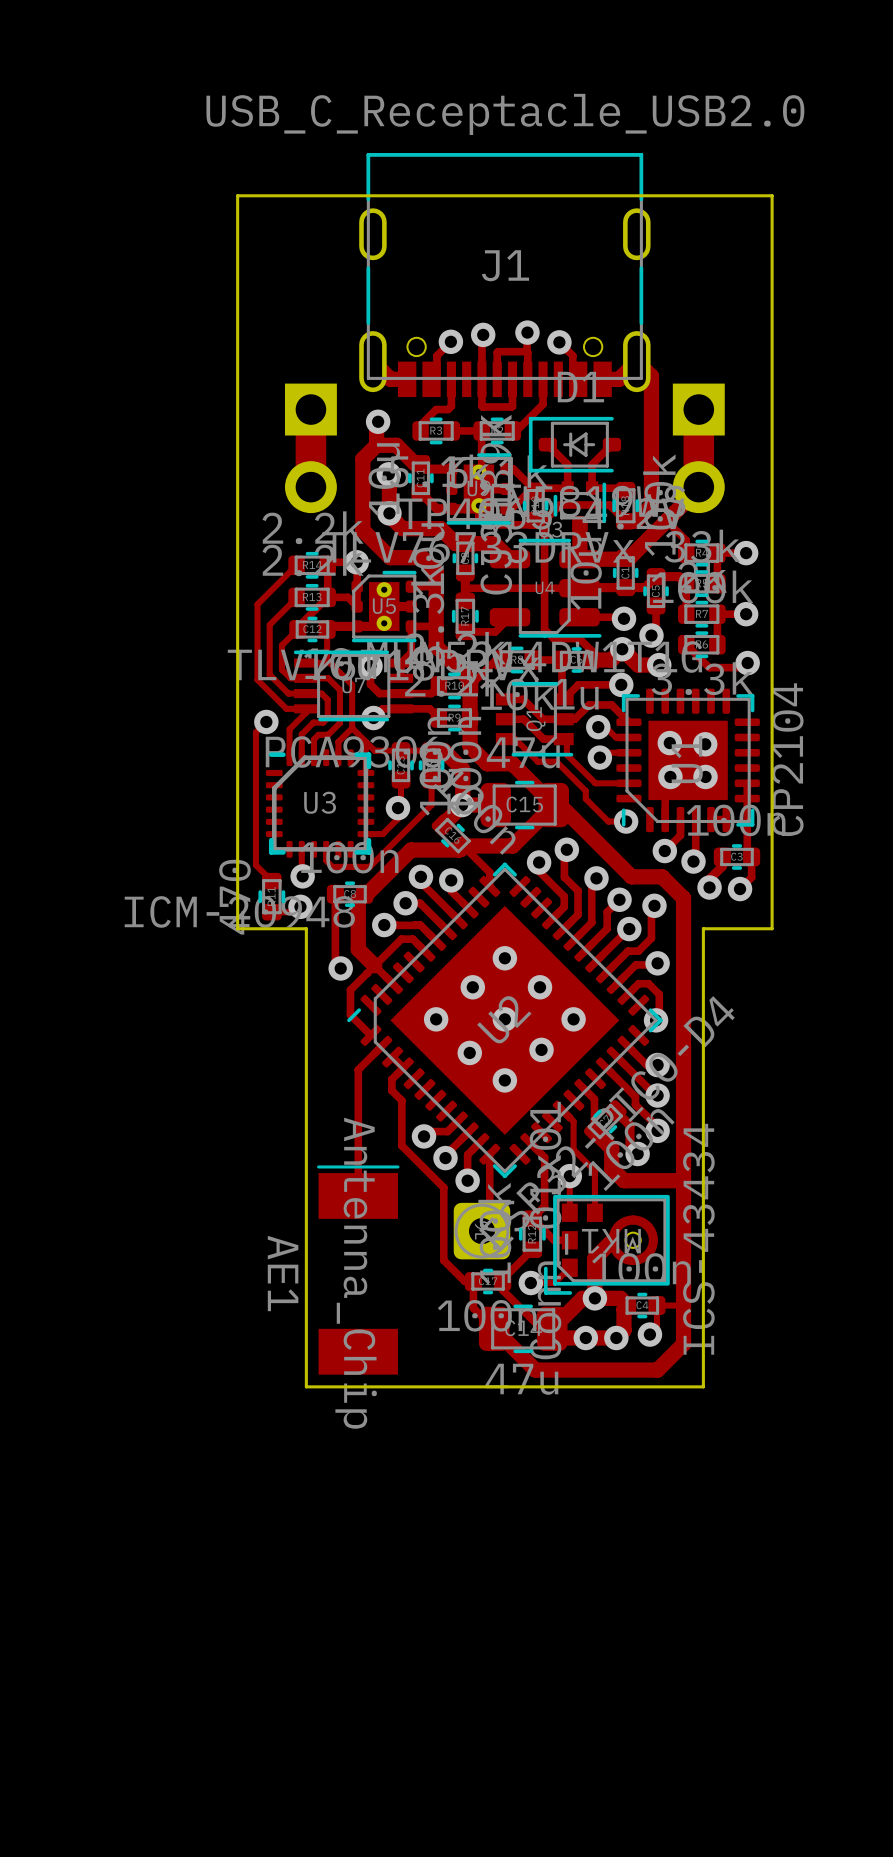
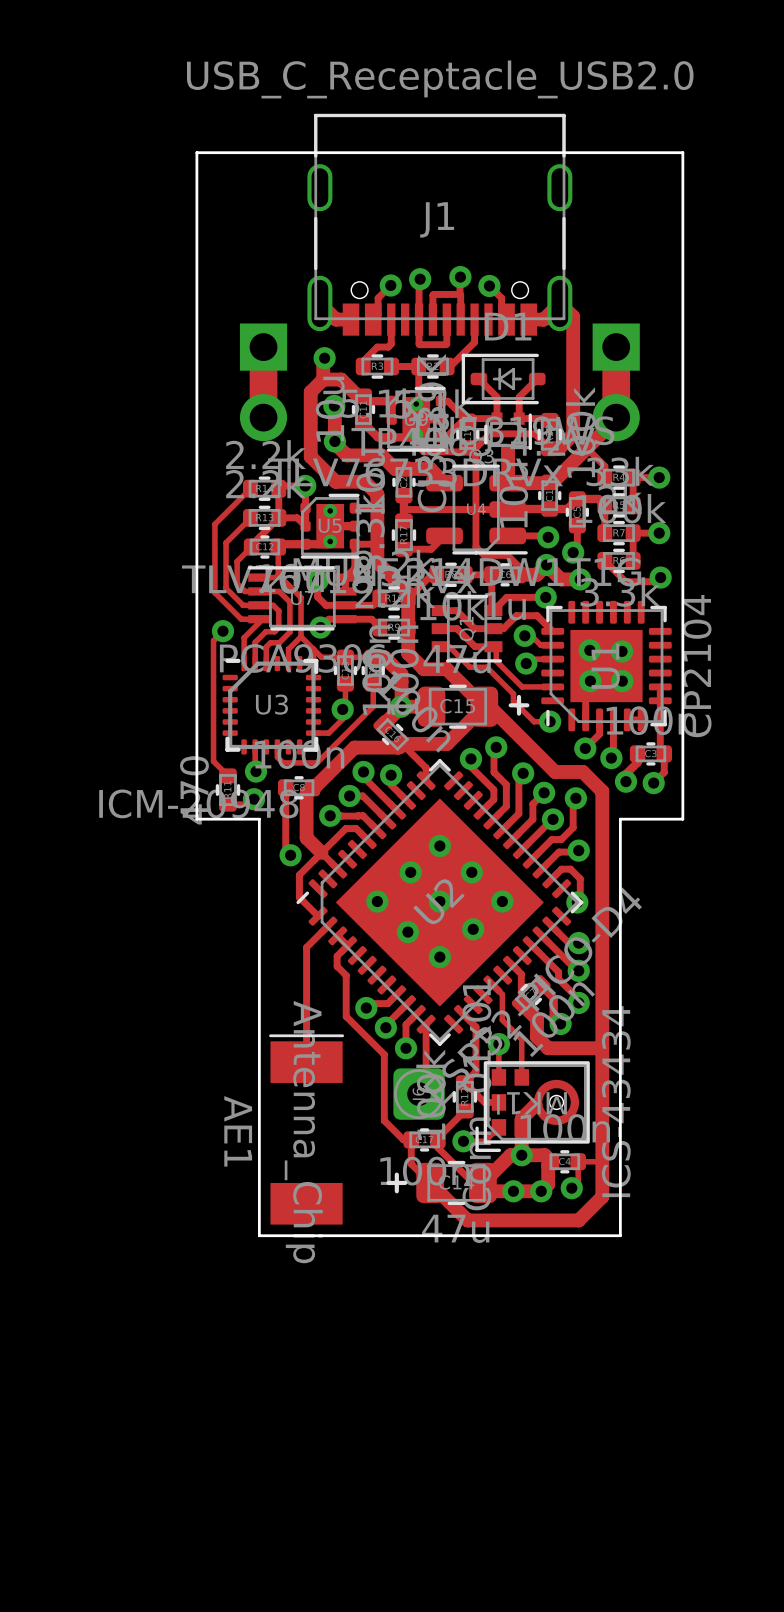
line: none -> (519, 696) (519, 713)
line: none -> (510, 705) (527, 705)
line: none -> (396, 1174) (396, 1191)
line: none -> (388, 1182) (405, 1182)

